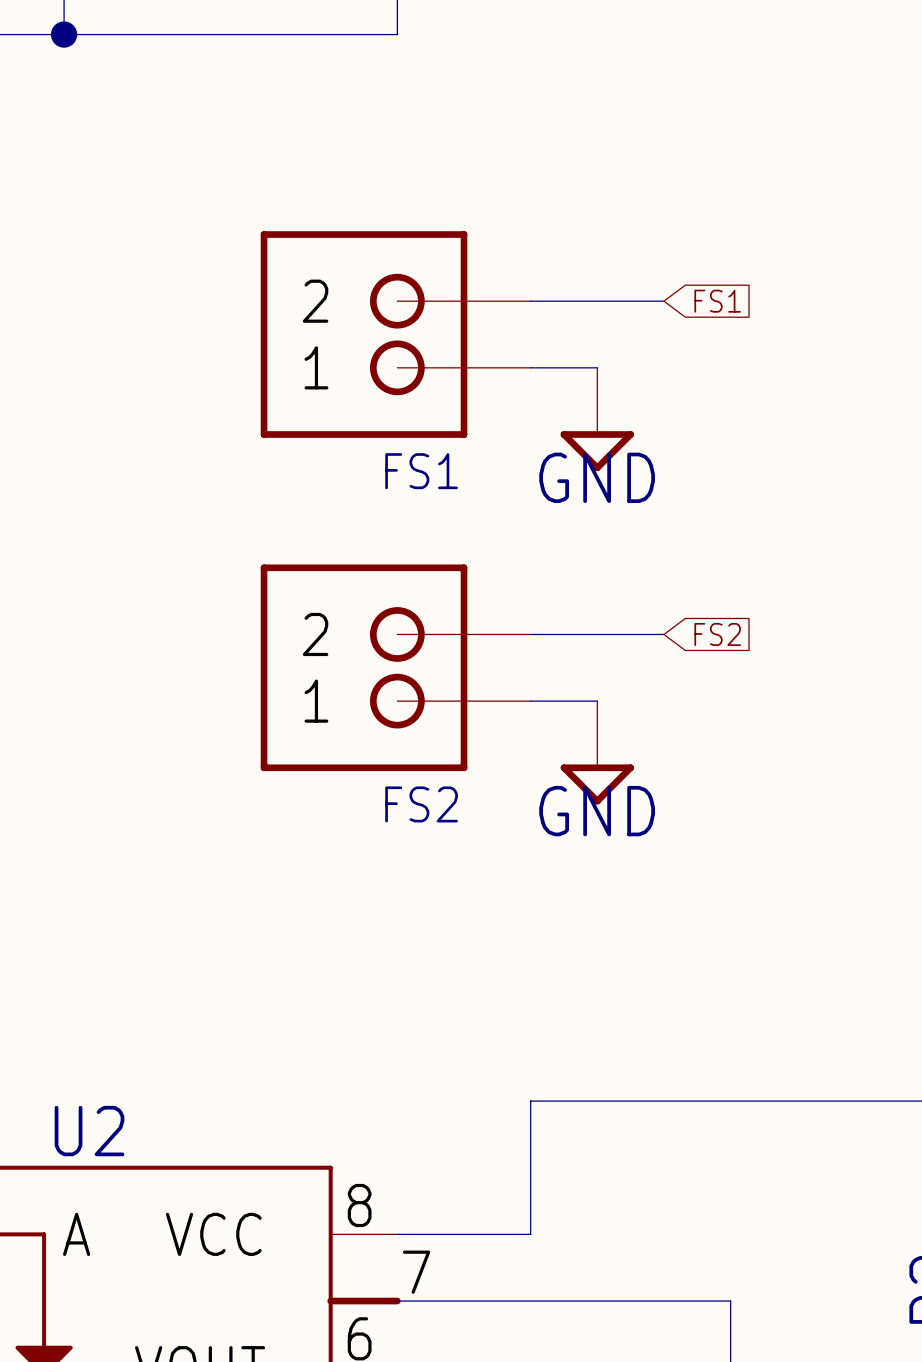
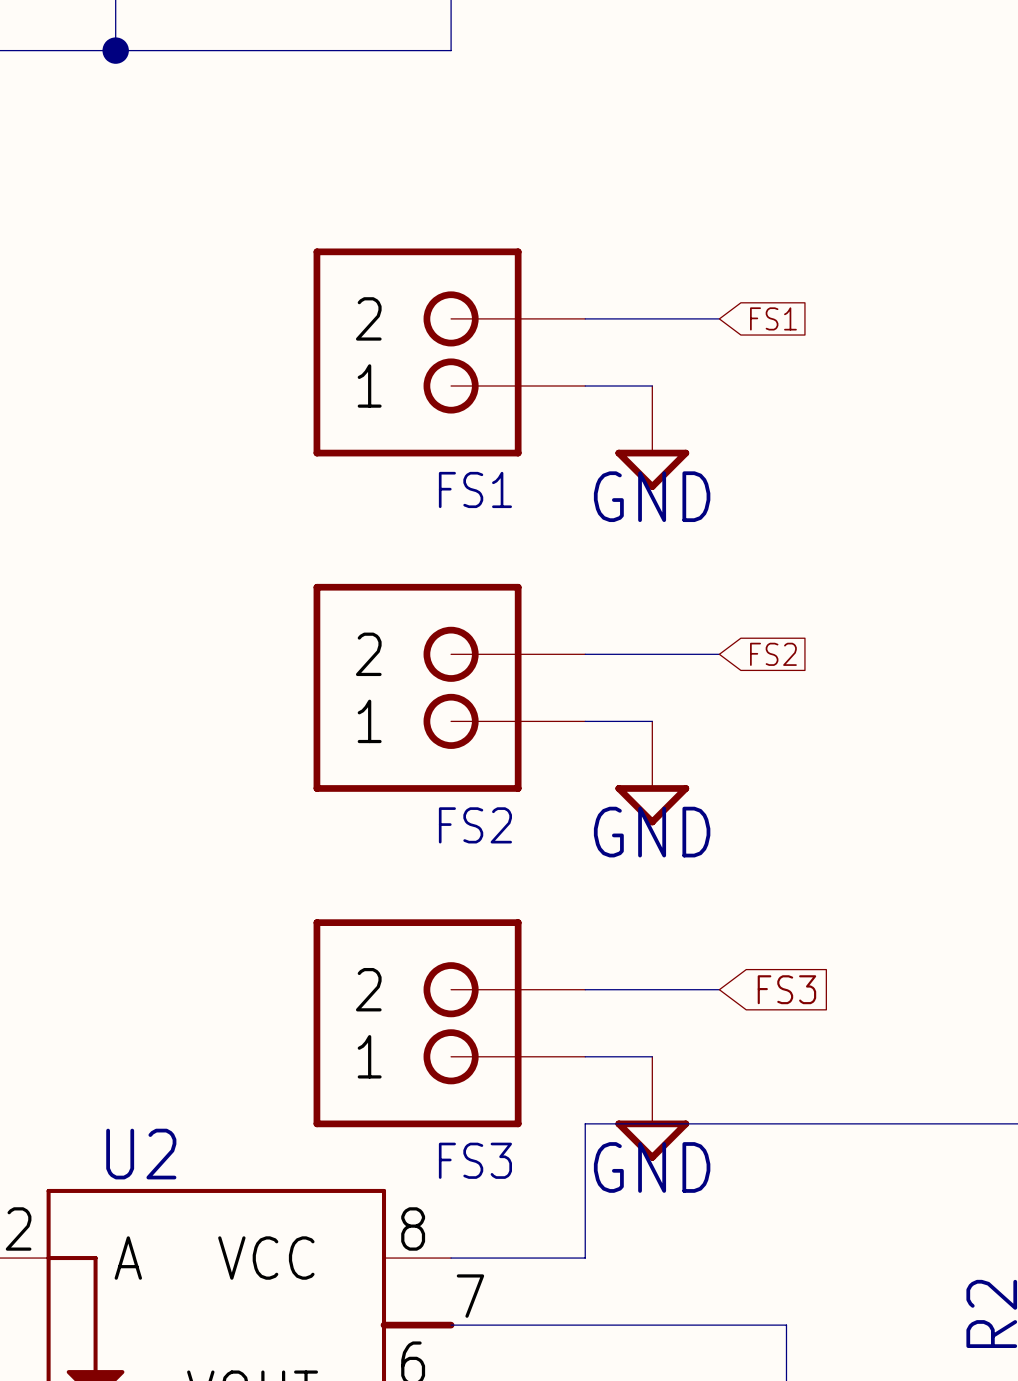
wire: none -> (585, 989) (719, 989)
global label: none -> FS3 (786, 989)
FS3: none -> (449, 1023)
wire: none -> (585, 1056) (652, 1056)
power symbol: none -> GND (652, 1108)

